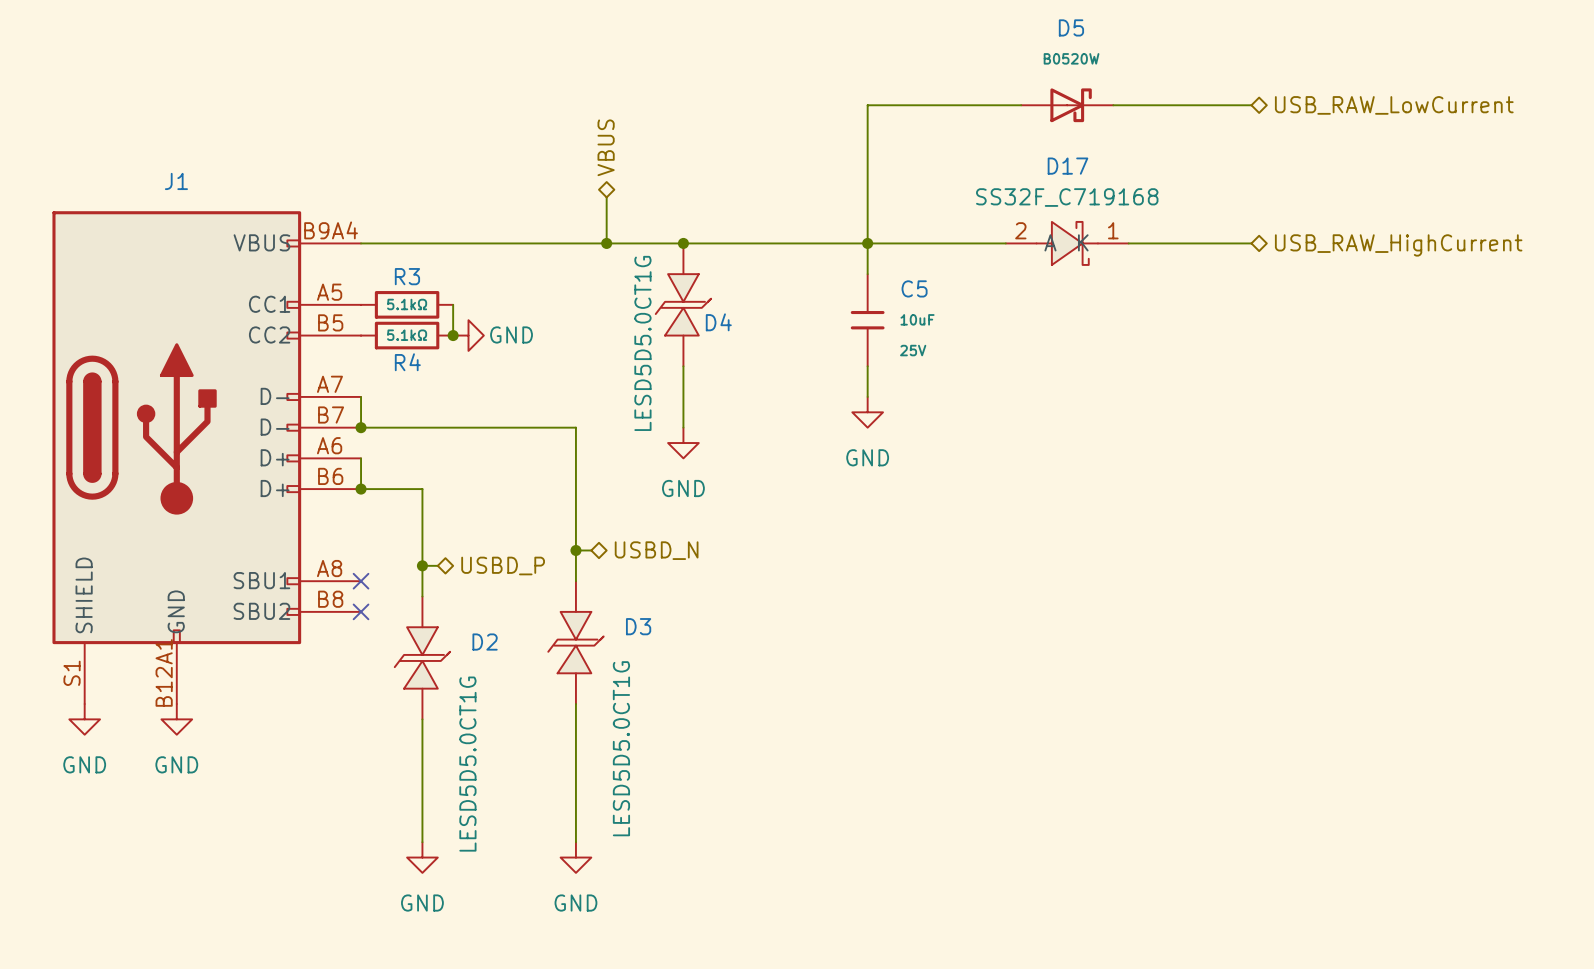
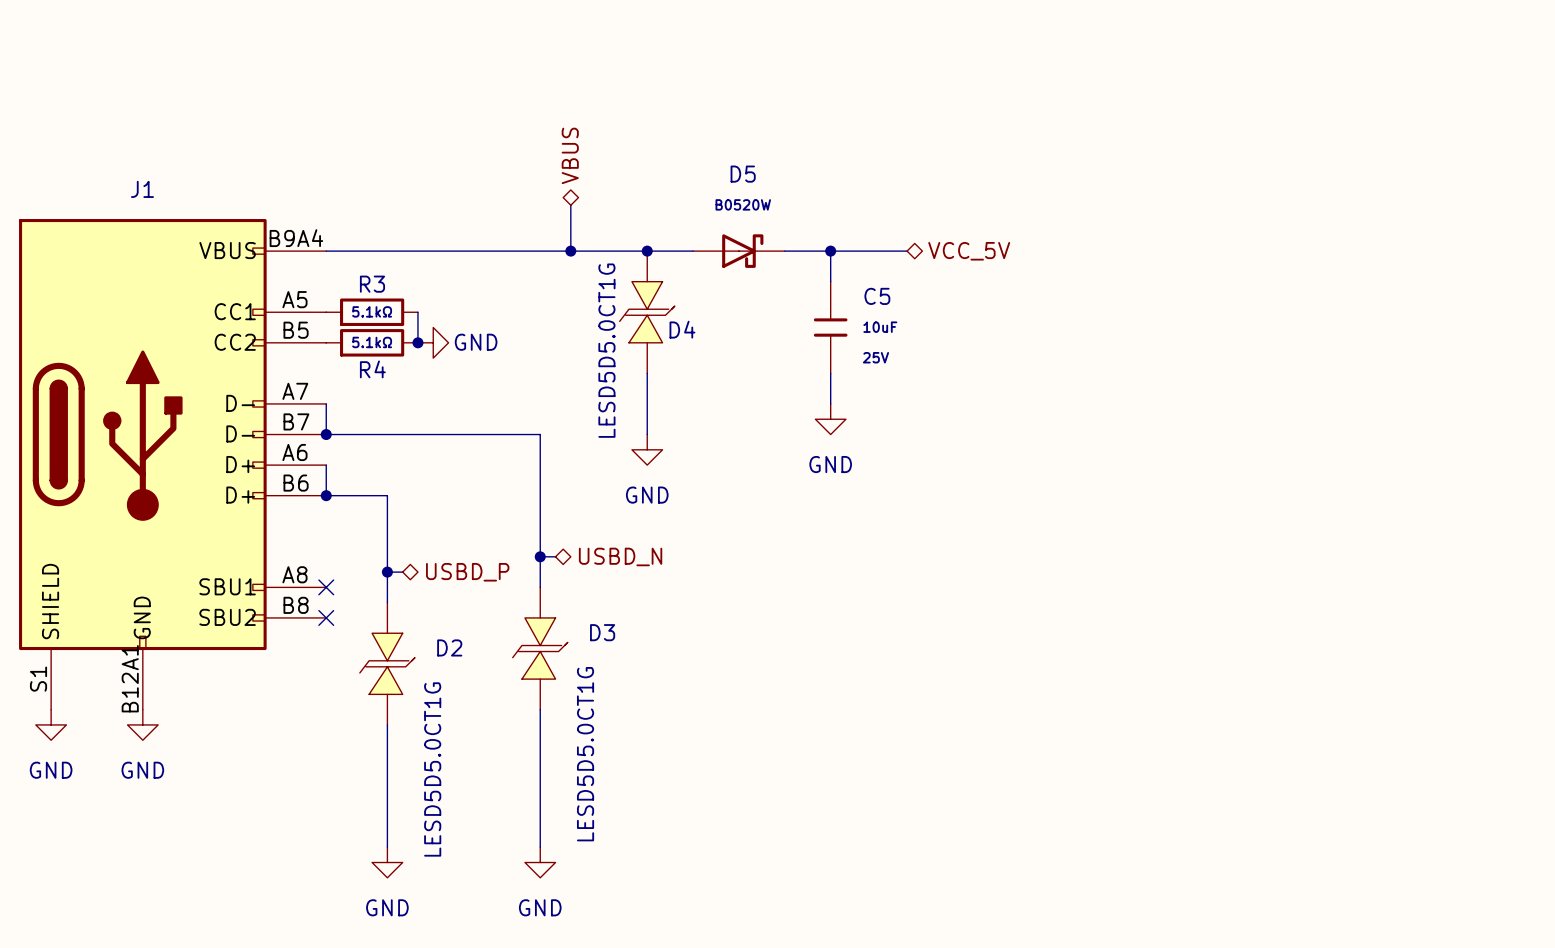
wire: (1021, 105) (867, 105) (867, 243) -> none
D5 position: (1067, 105) -> (738, 251)
wire: (1113, 105) (1251, 105) -> none
hierarchical label: USB_RAW_LowCurrent (1394, 105) -> none
wire: (944, 243) (1005, 243) -> none
hierarchical label: none -> VCC_5V (969, 251)
D17: SS32F_C719168 (1067, 243) -> none
wire: (1128, 243) (1251, 243) -> none
hierarchical label: USB_RAW_HighCurrent (1398, 245) -> none

